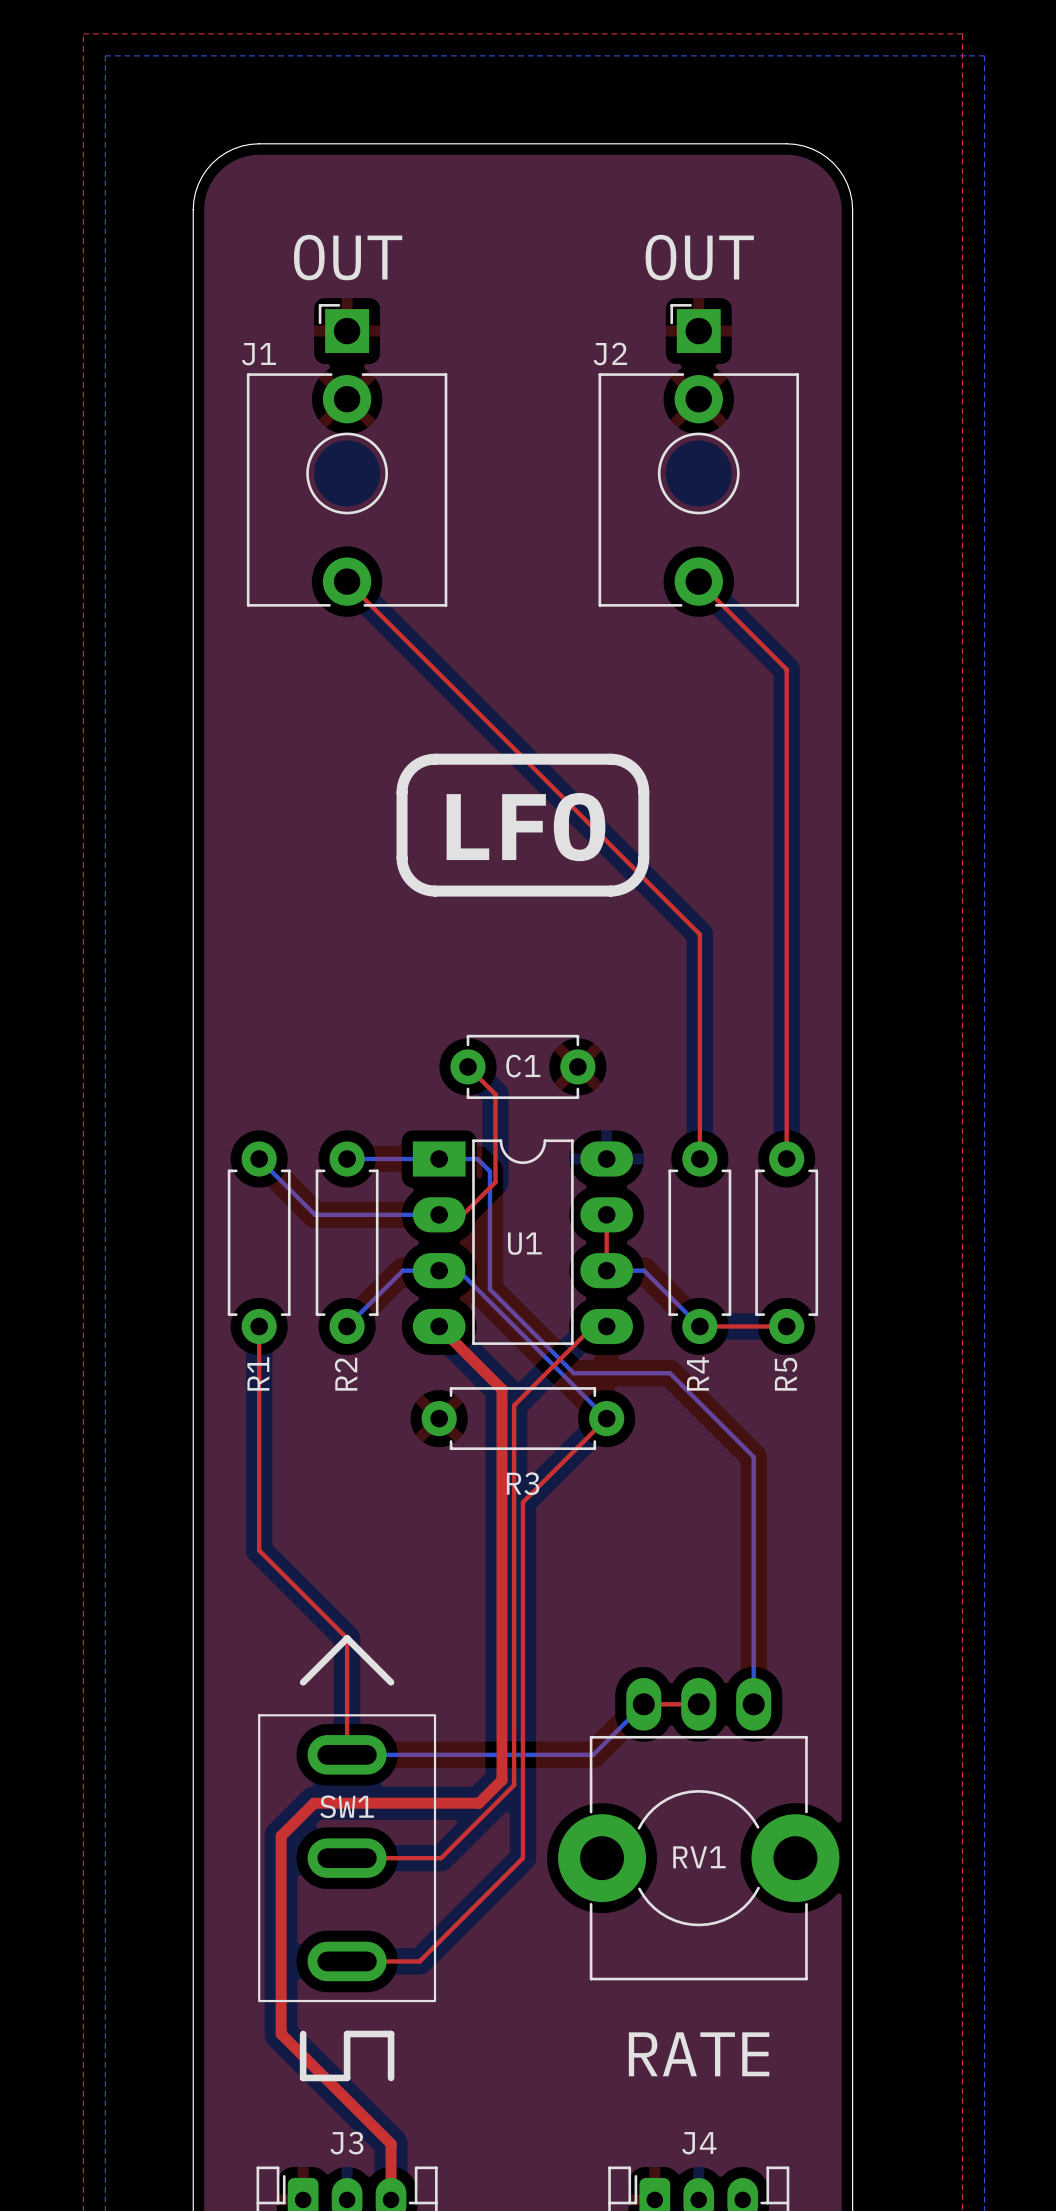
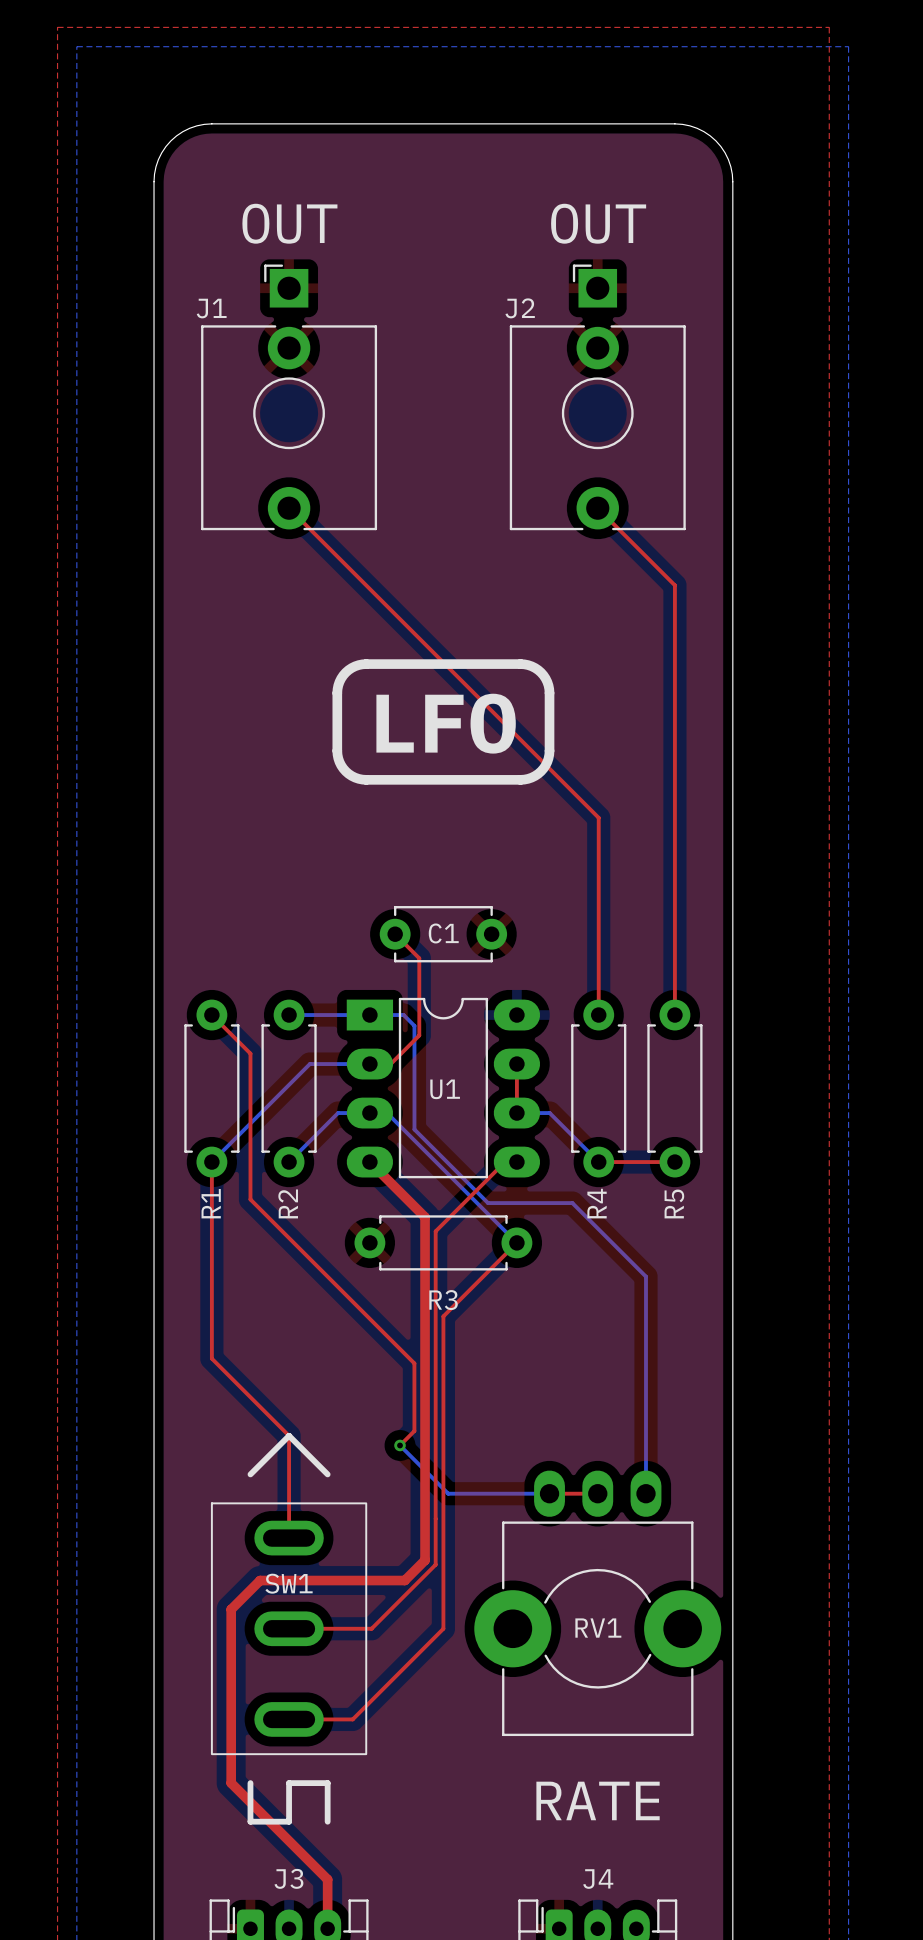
top track: none -> (211, 1015) (250, 1053) (250, 1199) (414, 1363) (414, 1431) (400, 1445)
bottom track: (259, 1159) (315, 1214) (370, 1214) -> (211, 1162) (309, 1064)
via: none -> (400, 1445)
bottom track: (643, 1704) (593, 1754) (347, 1754) -> (549, 1493) (448, 1493) (400, 1445)

